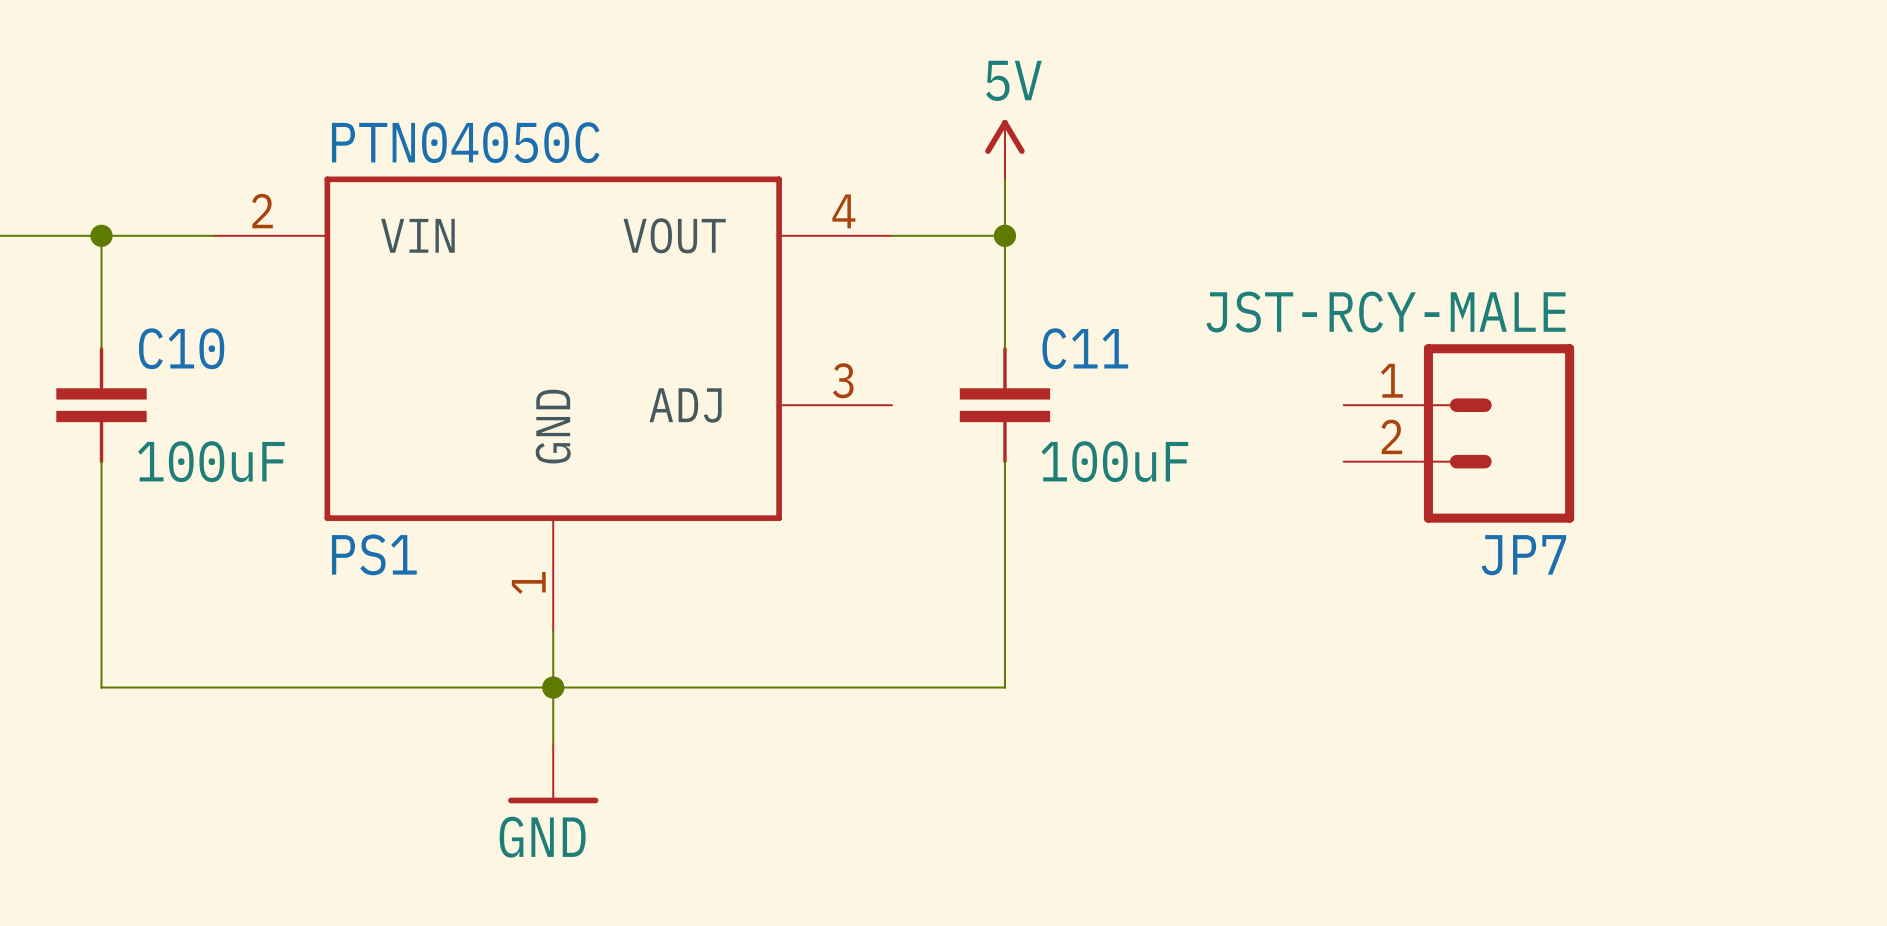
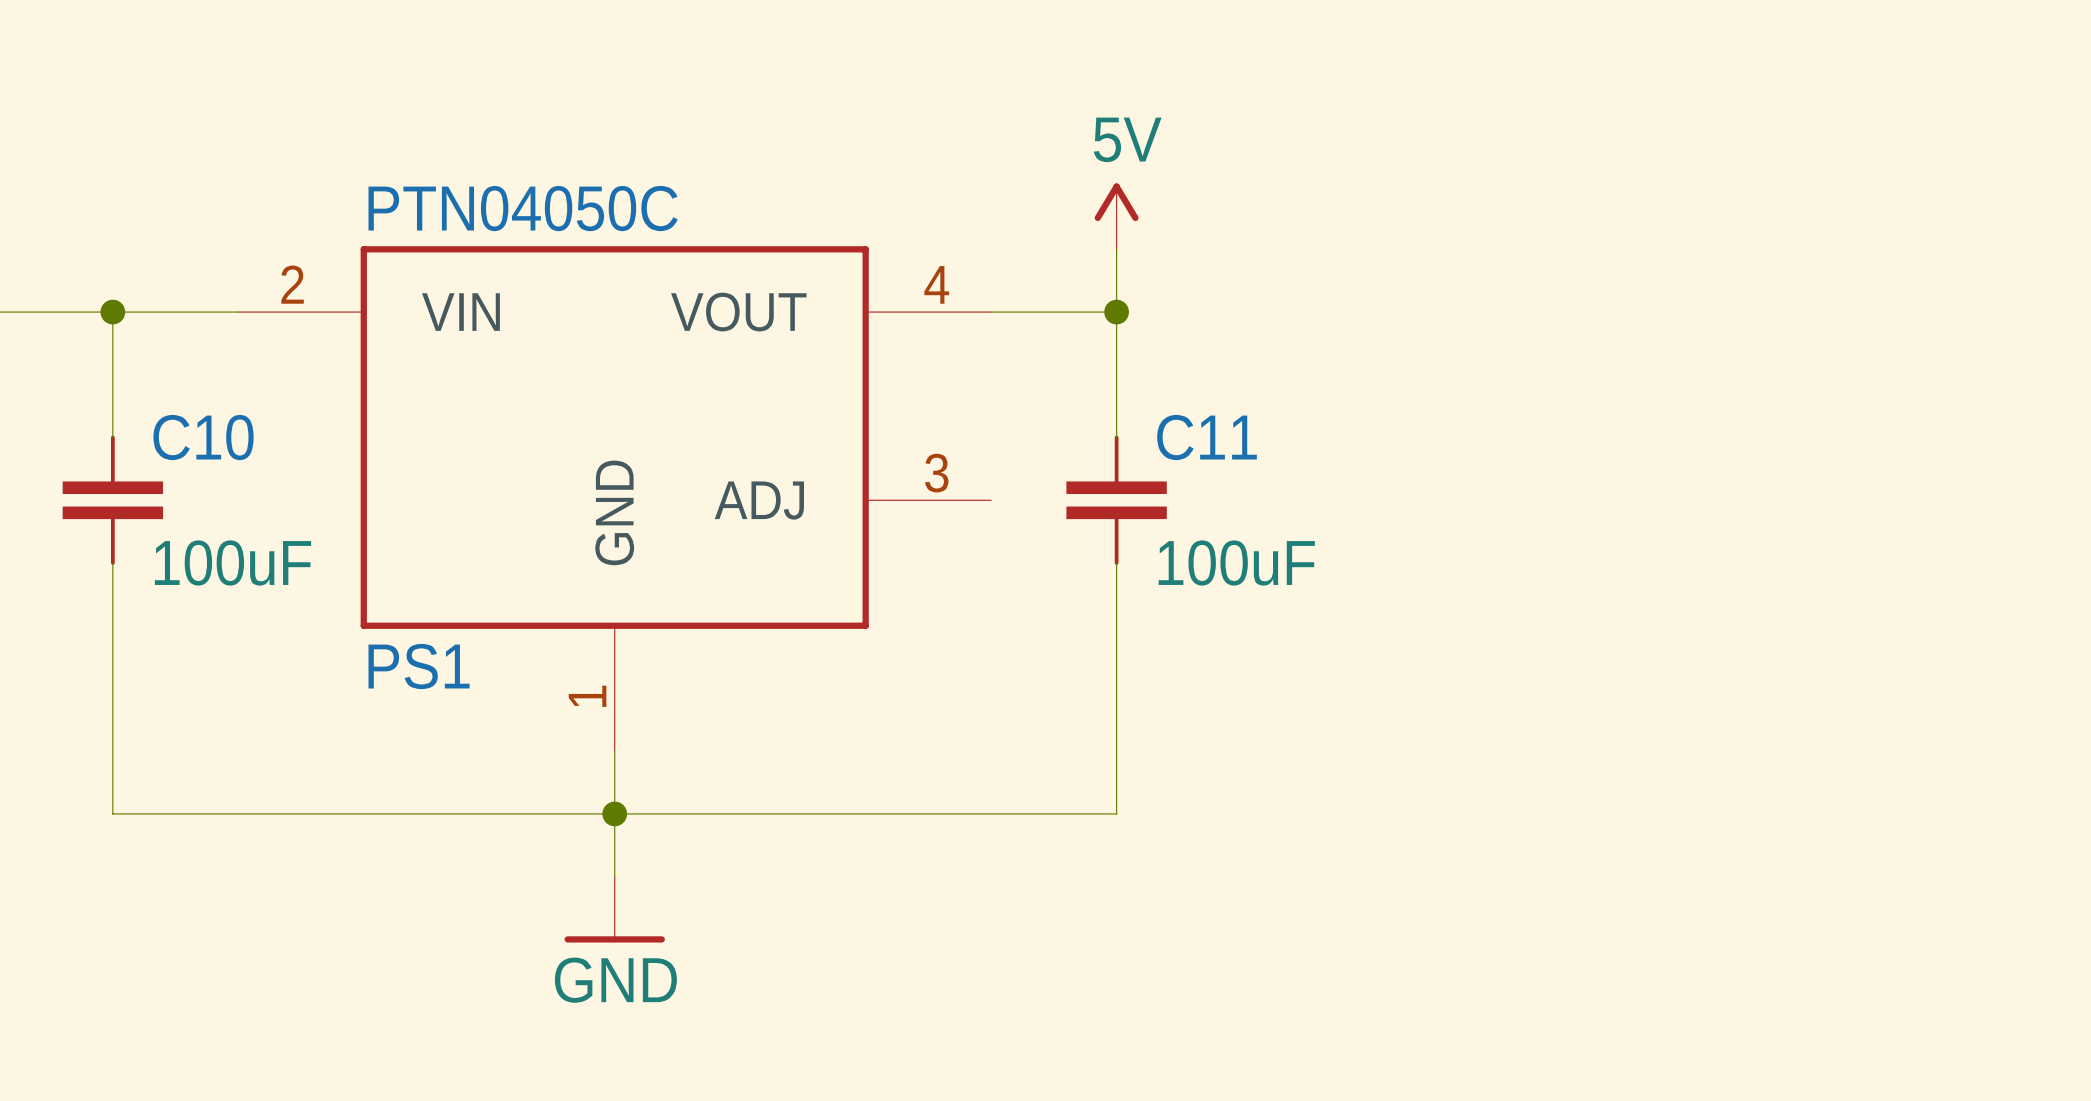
JP7: JST-RCY-MALE (1458, 433) -> none

